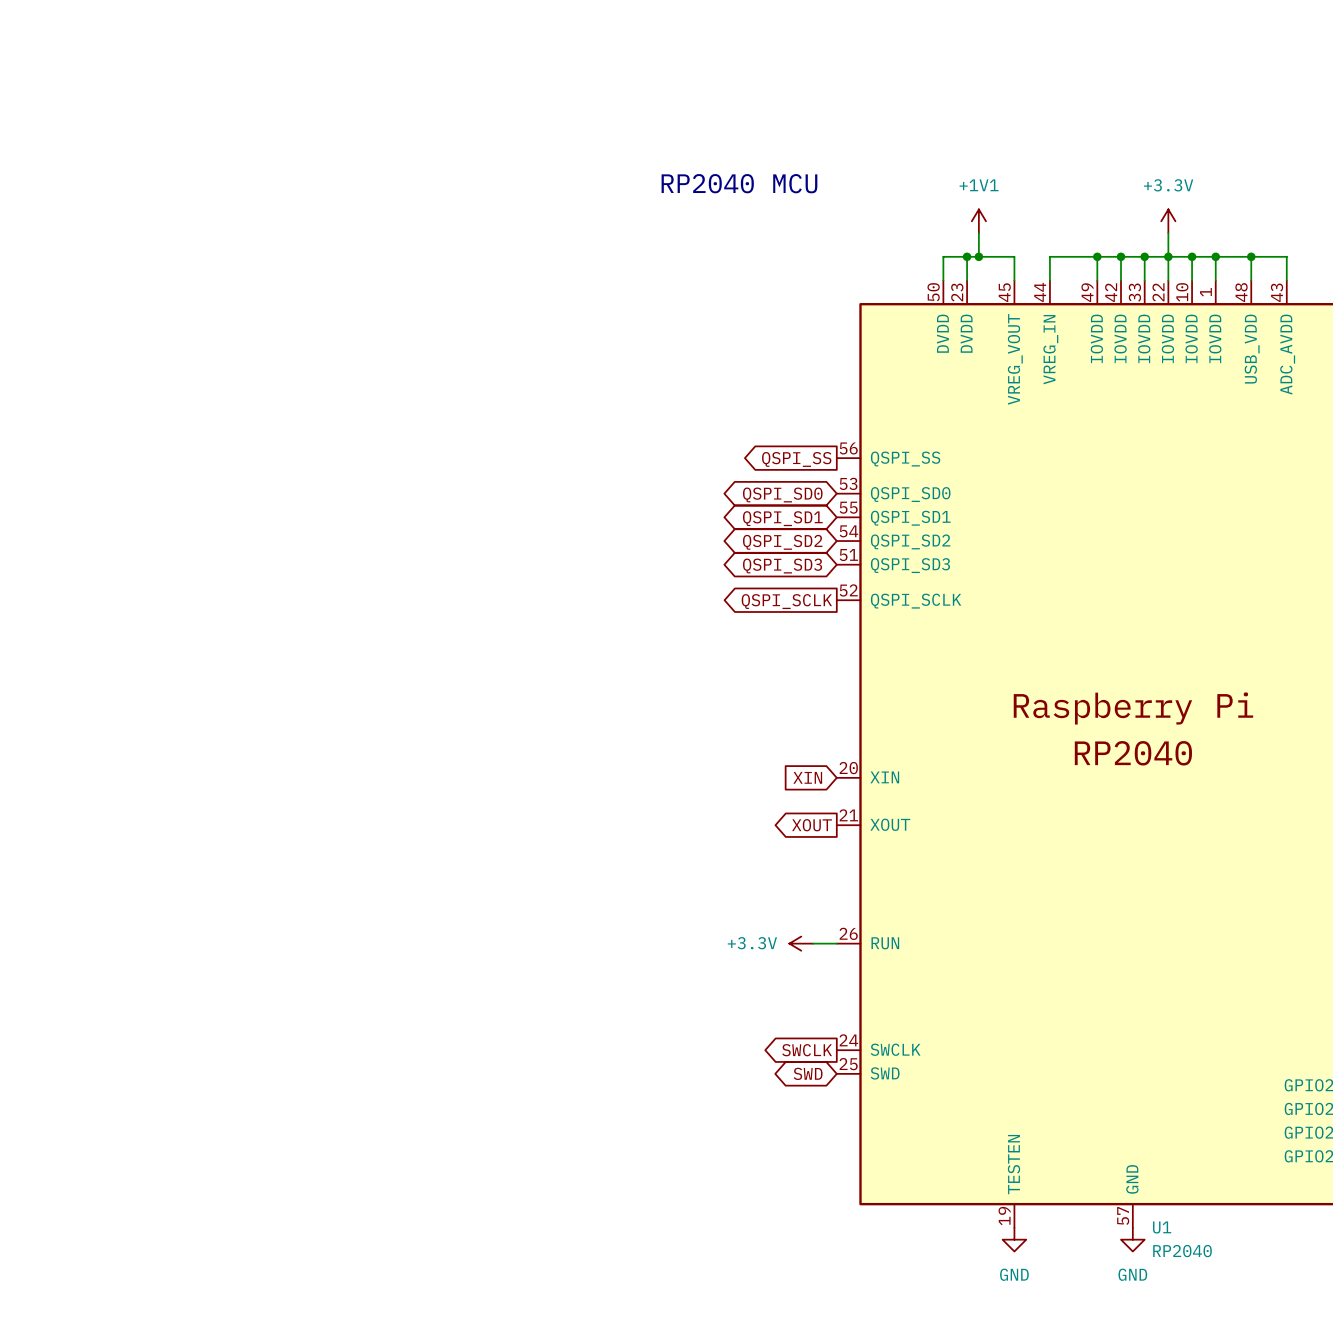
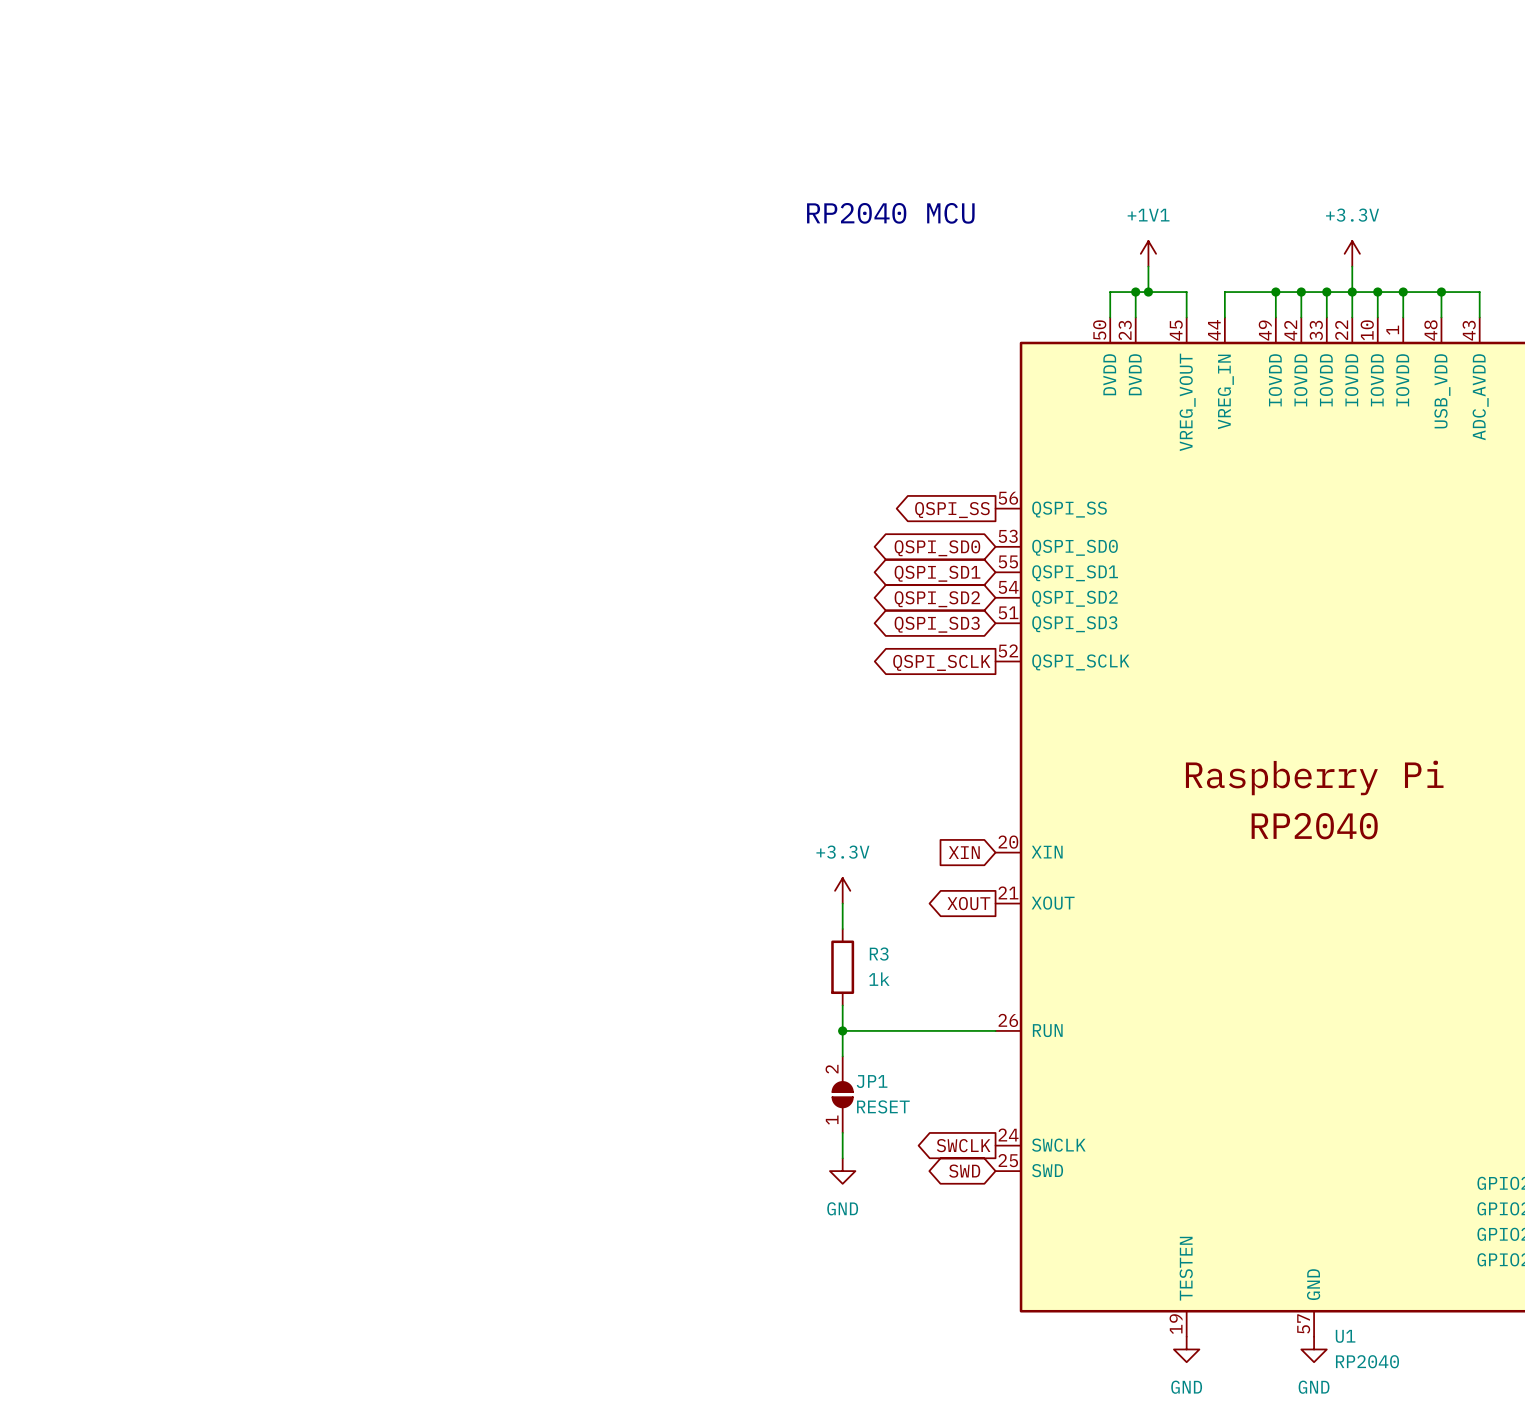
wire: none -> (842, 903) (842, 929)
R3: none -> 1k (842, 967)
wire: none -> (842, 1005) (842, 1056)
wire: none -> (842, 1030) (970, 1030)
junction: none -> (842, 1030)
power symbol text position: +3.3V (752, 943) -> +3.3V (842, 852)
power symbol rotation: 0° (801, 943) -> 90° clockwise (842, 890)
power symbol position: +3.3V (801, 943) -> +3.3V (842, 890)
JP1: none -> RESET (842, 1094)
wire: none -> (842, 1132) (842, 1158)
power symbol: none -> GND (842, 1171)

